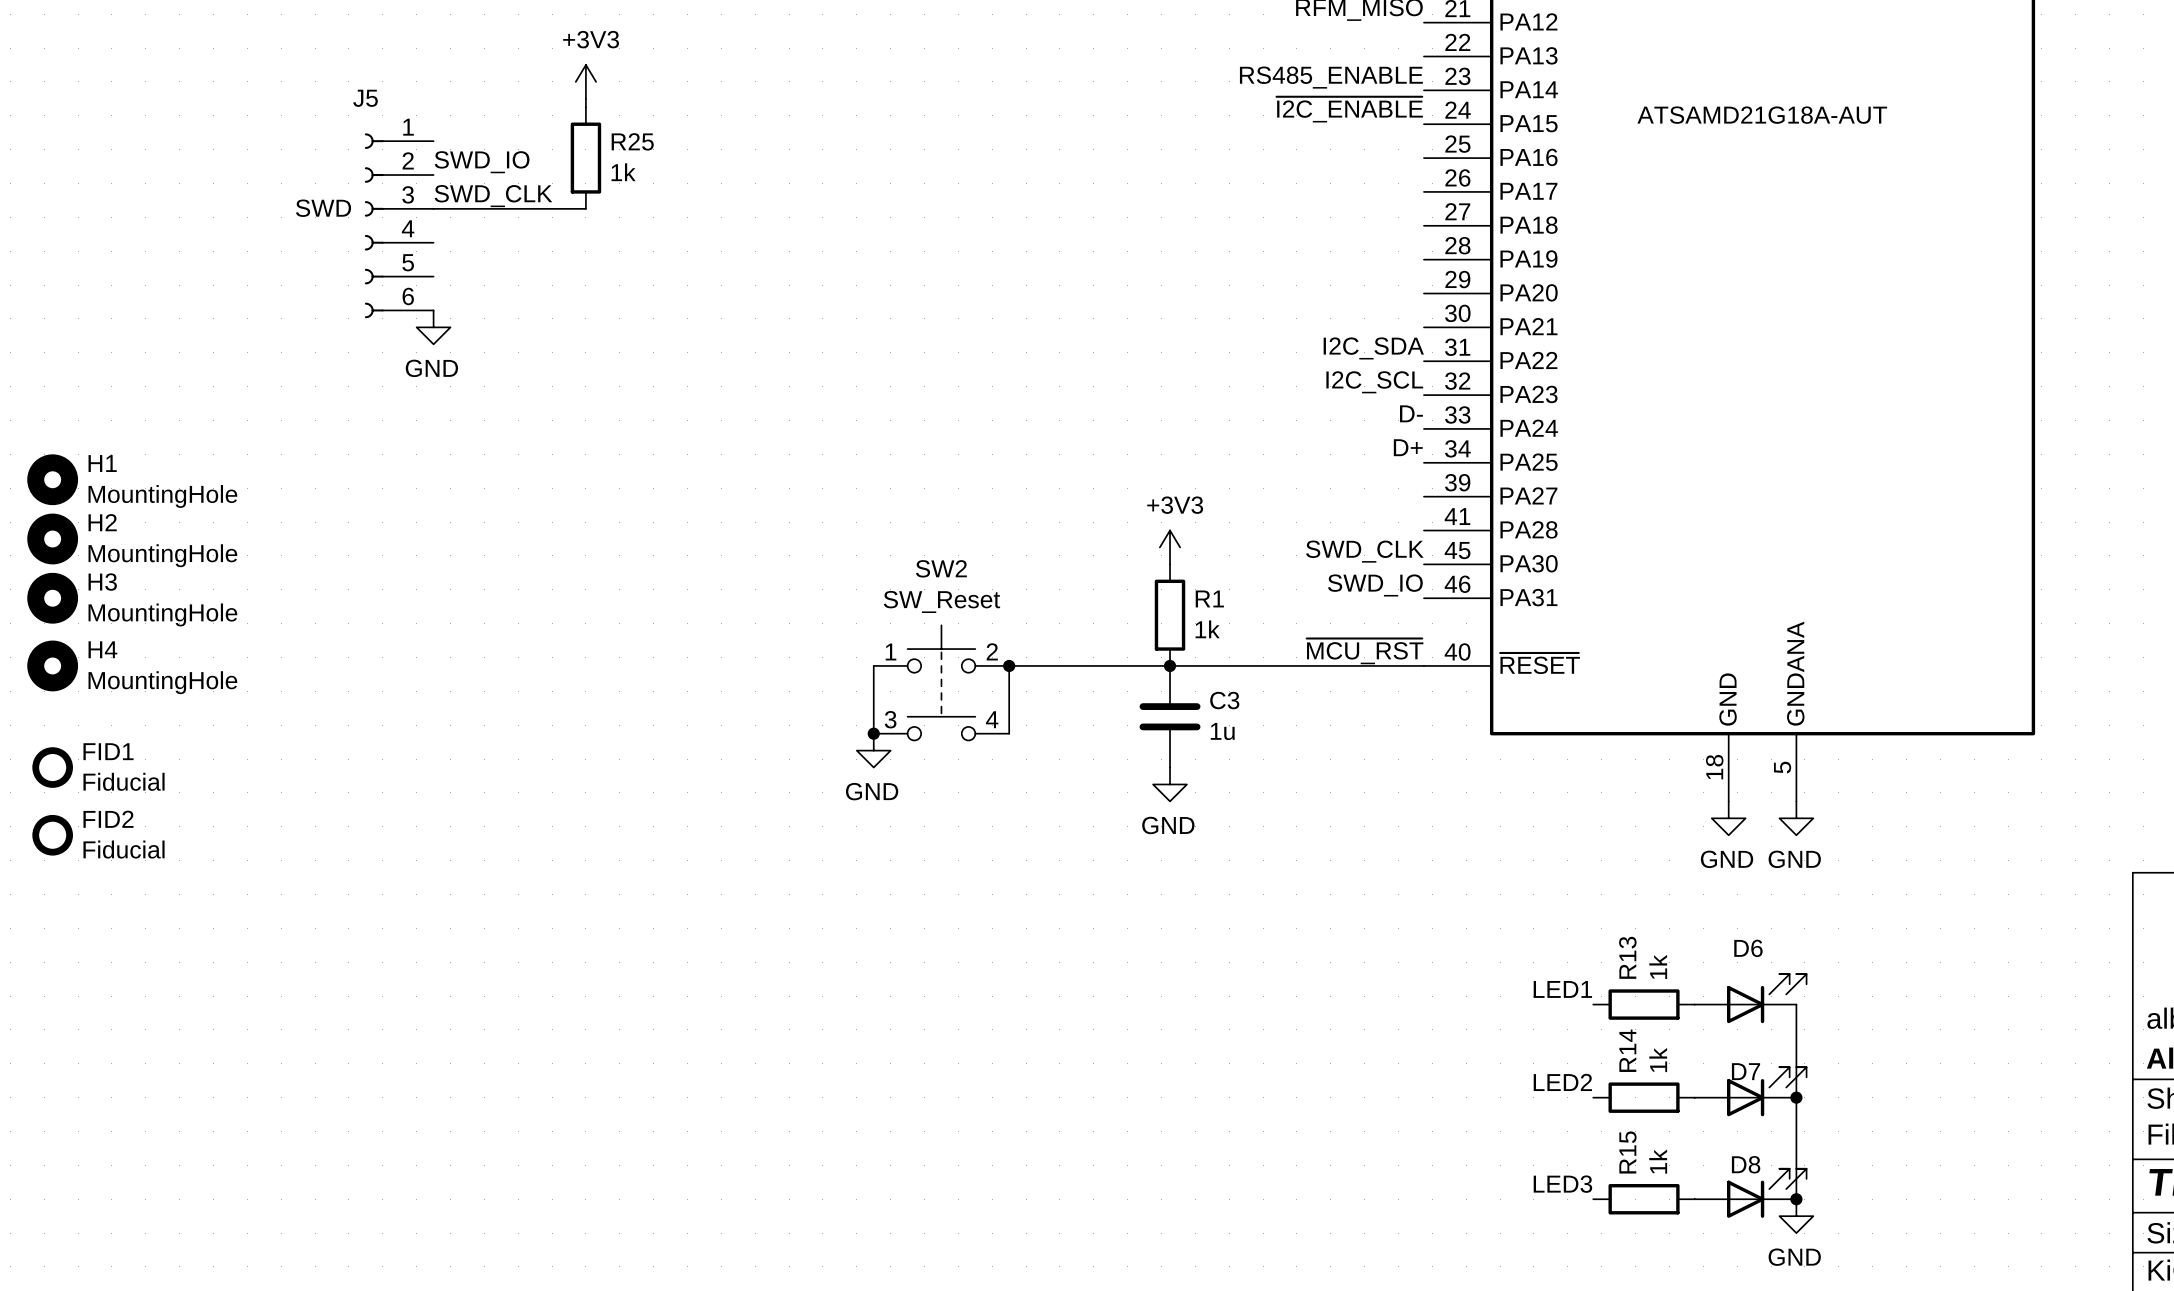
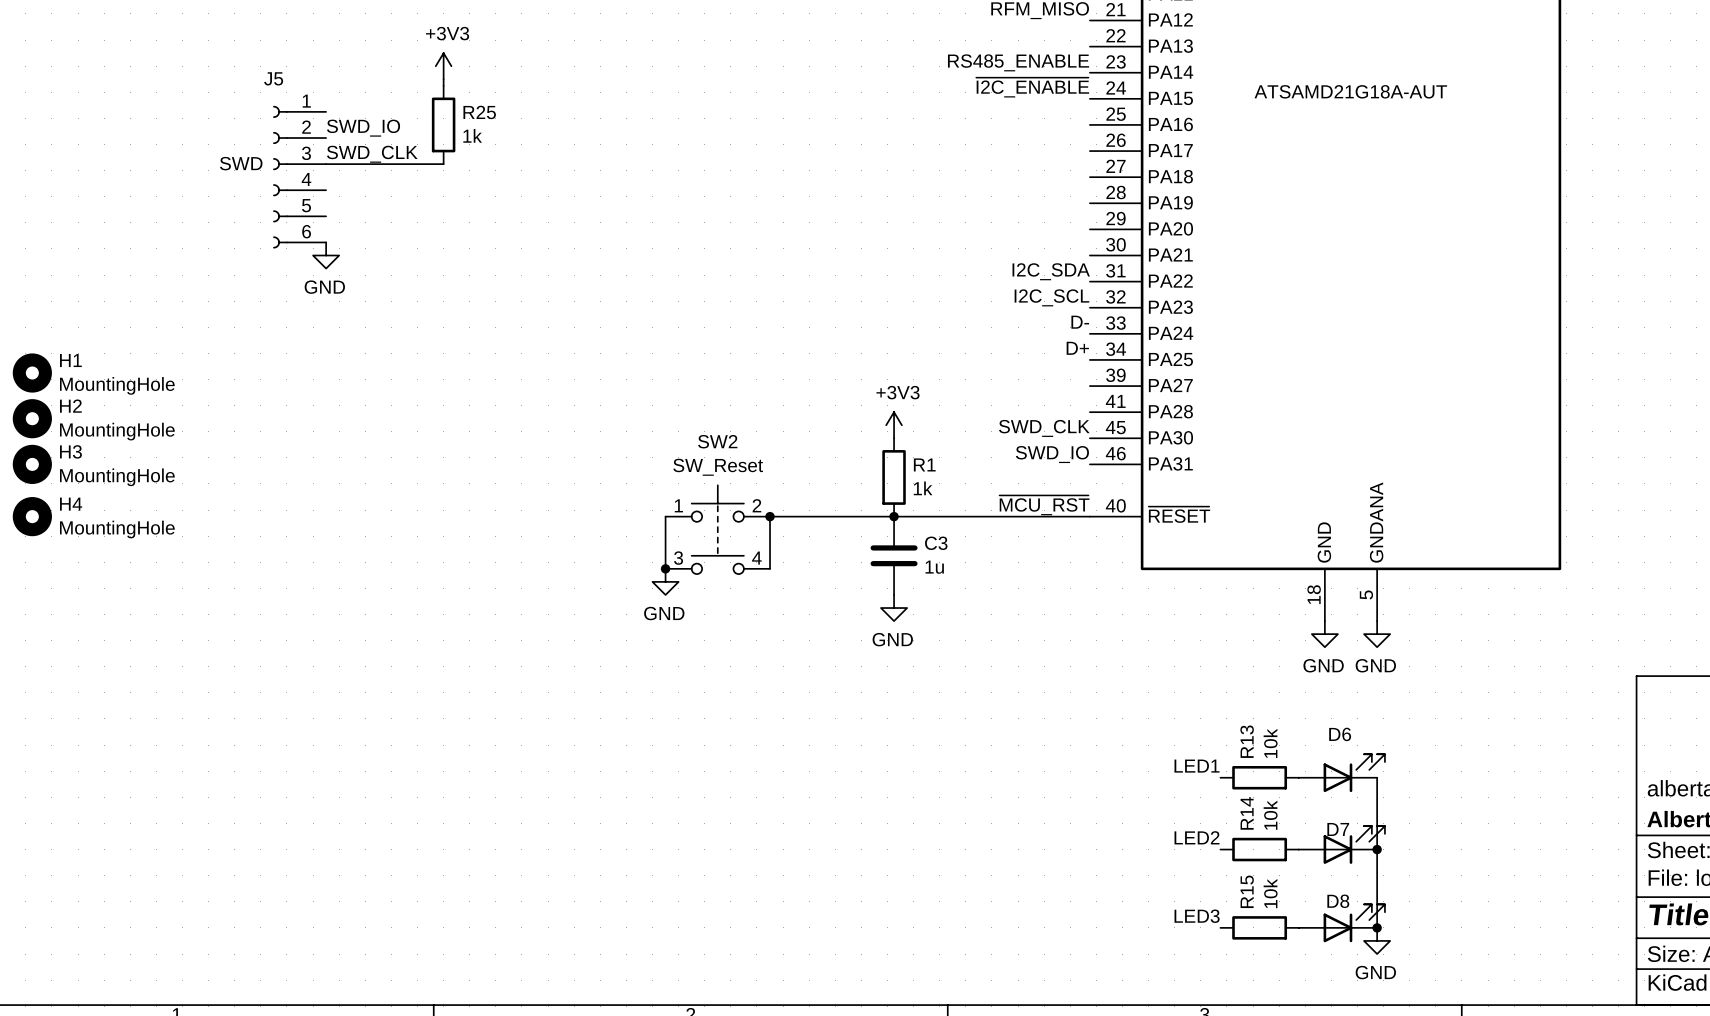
FID1: Fiducial (52, 767) -> none
FID2: Fiducial (52, 835) -> none
R13 value: 1k (1658, 966) -> 10k (1270, 743)
R14 value: 1k (1658, 1060) -> 10k (1270, 815)
R15 value: 1k (1658, 1161) -> 10k (1270, 893)

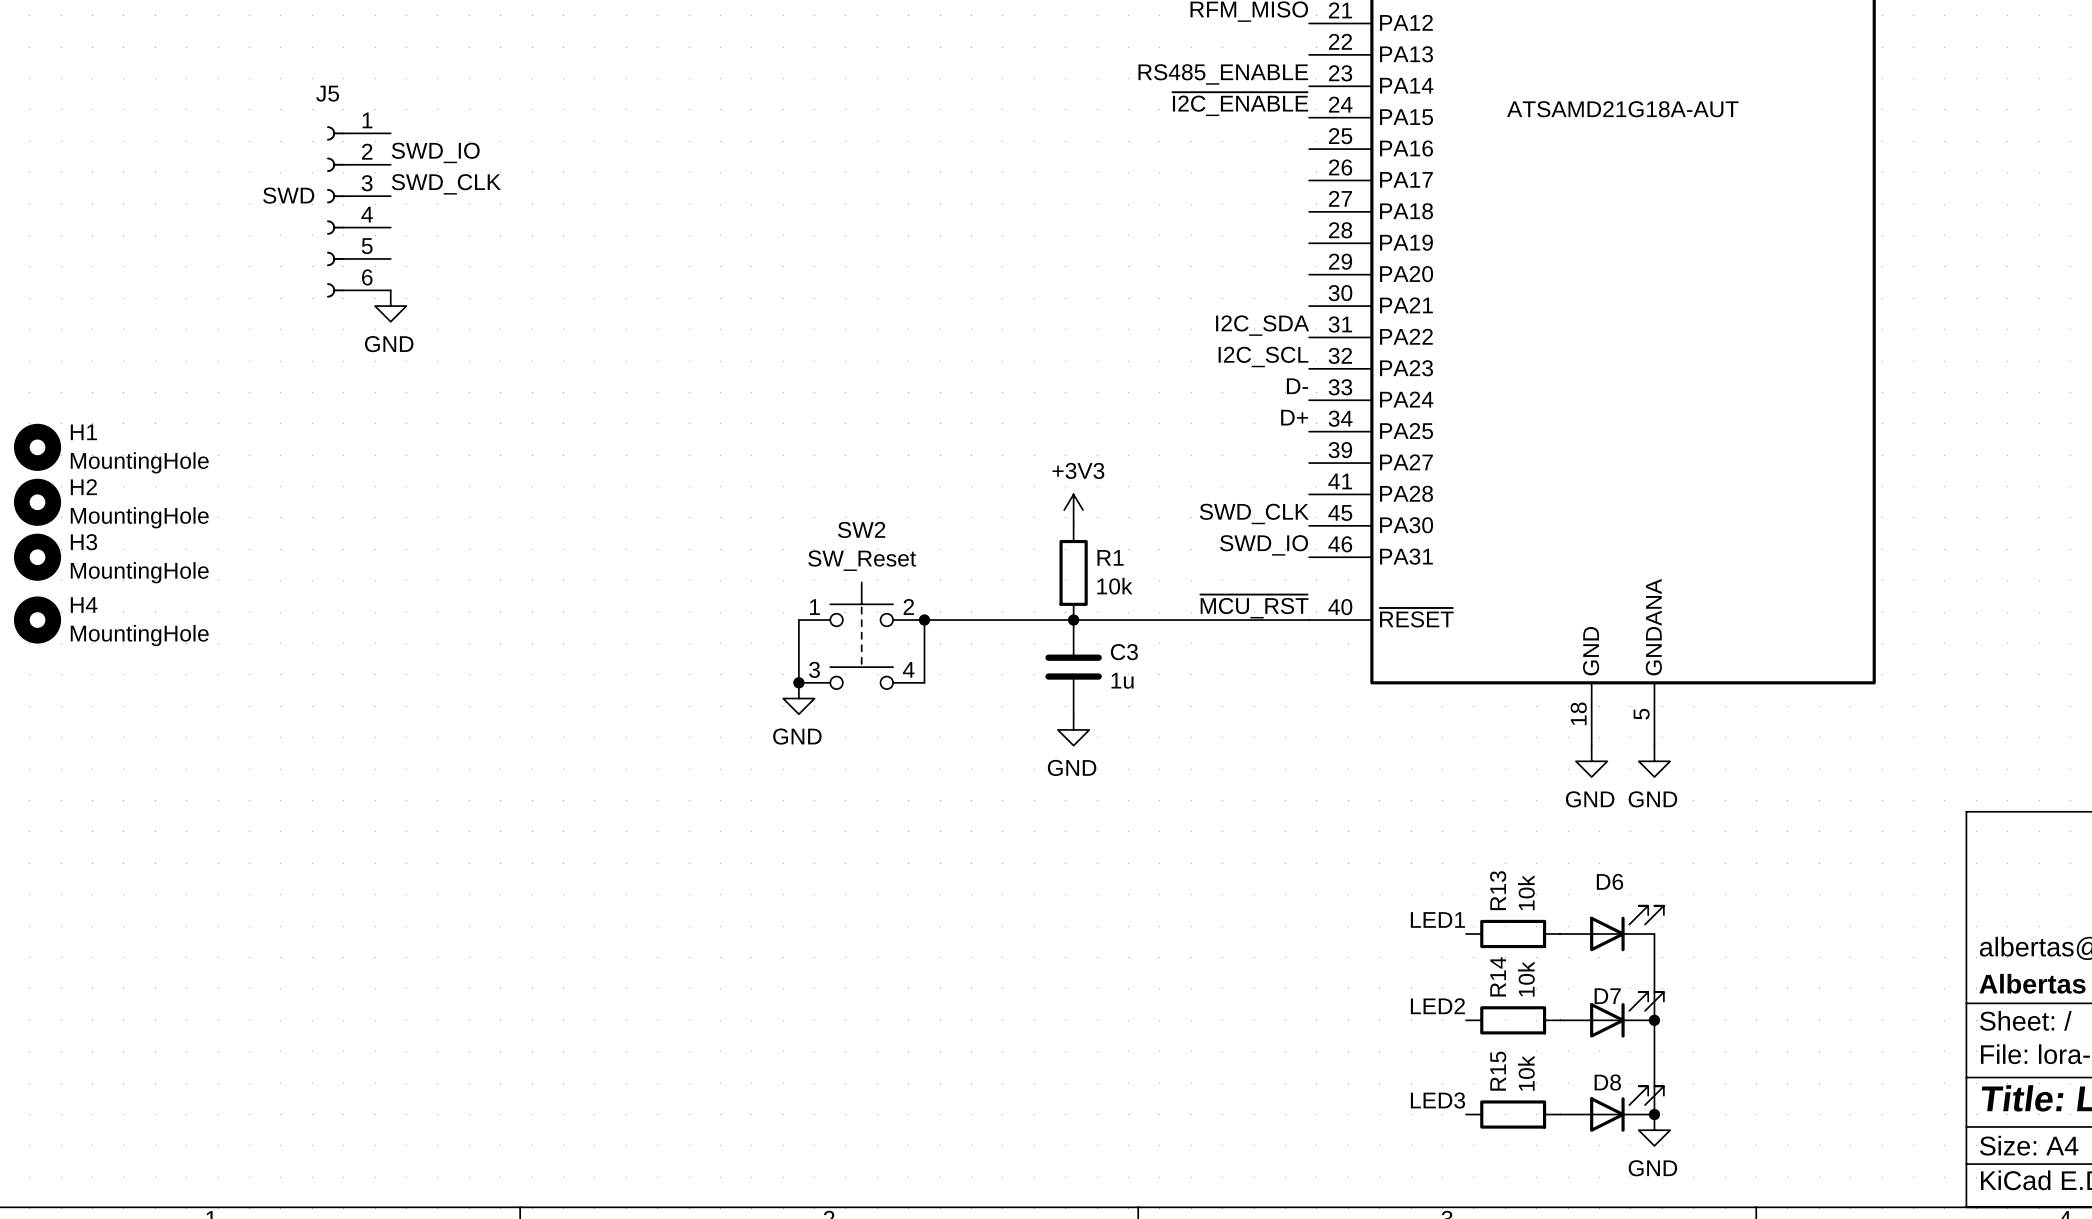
power symbol: +3V3 (443, 66) -> none
wire: (443, 79) (443, 85) -> none
R25: 1k (443, 124) -> none
wire: (326, 164) (443, 164) -> none
R1 value: 1k (923, 488) -> 10k (1114, 586)

